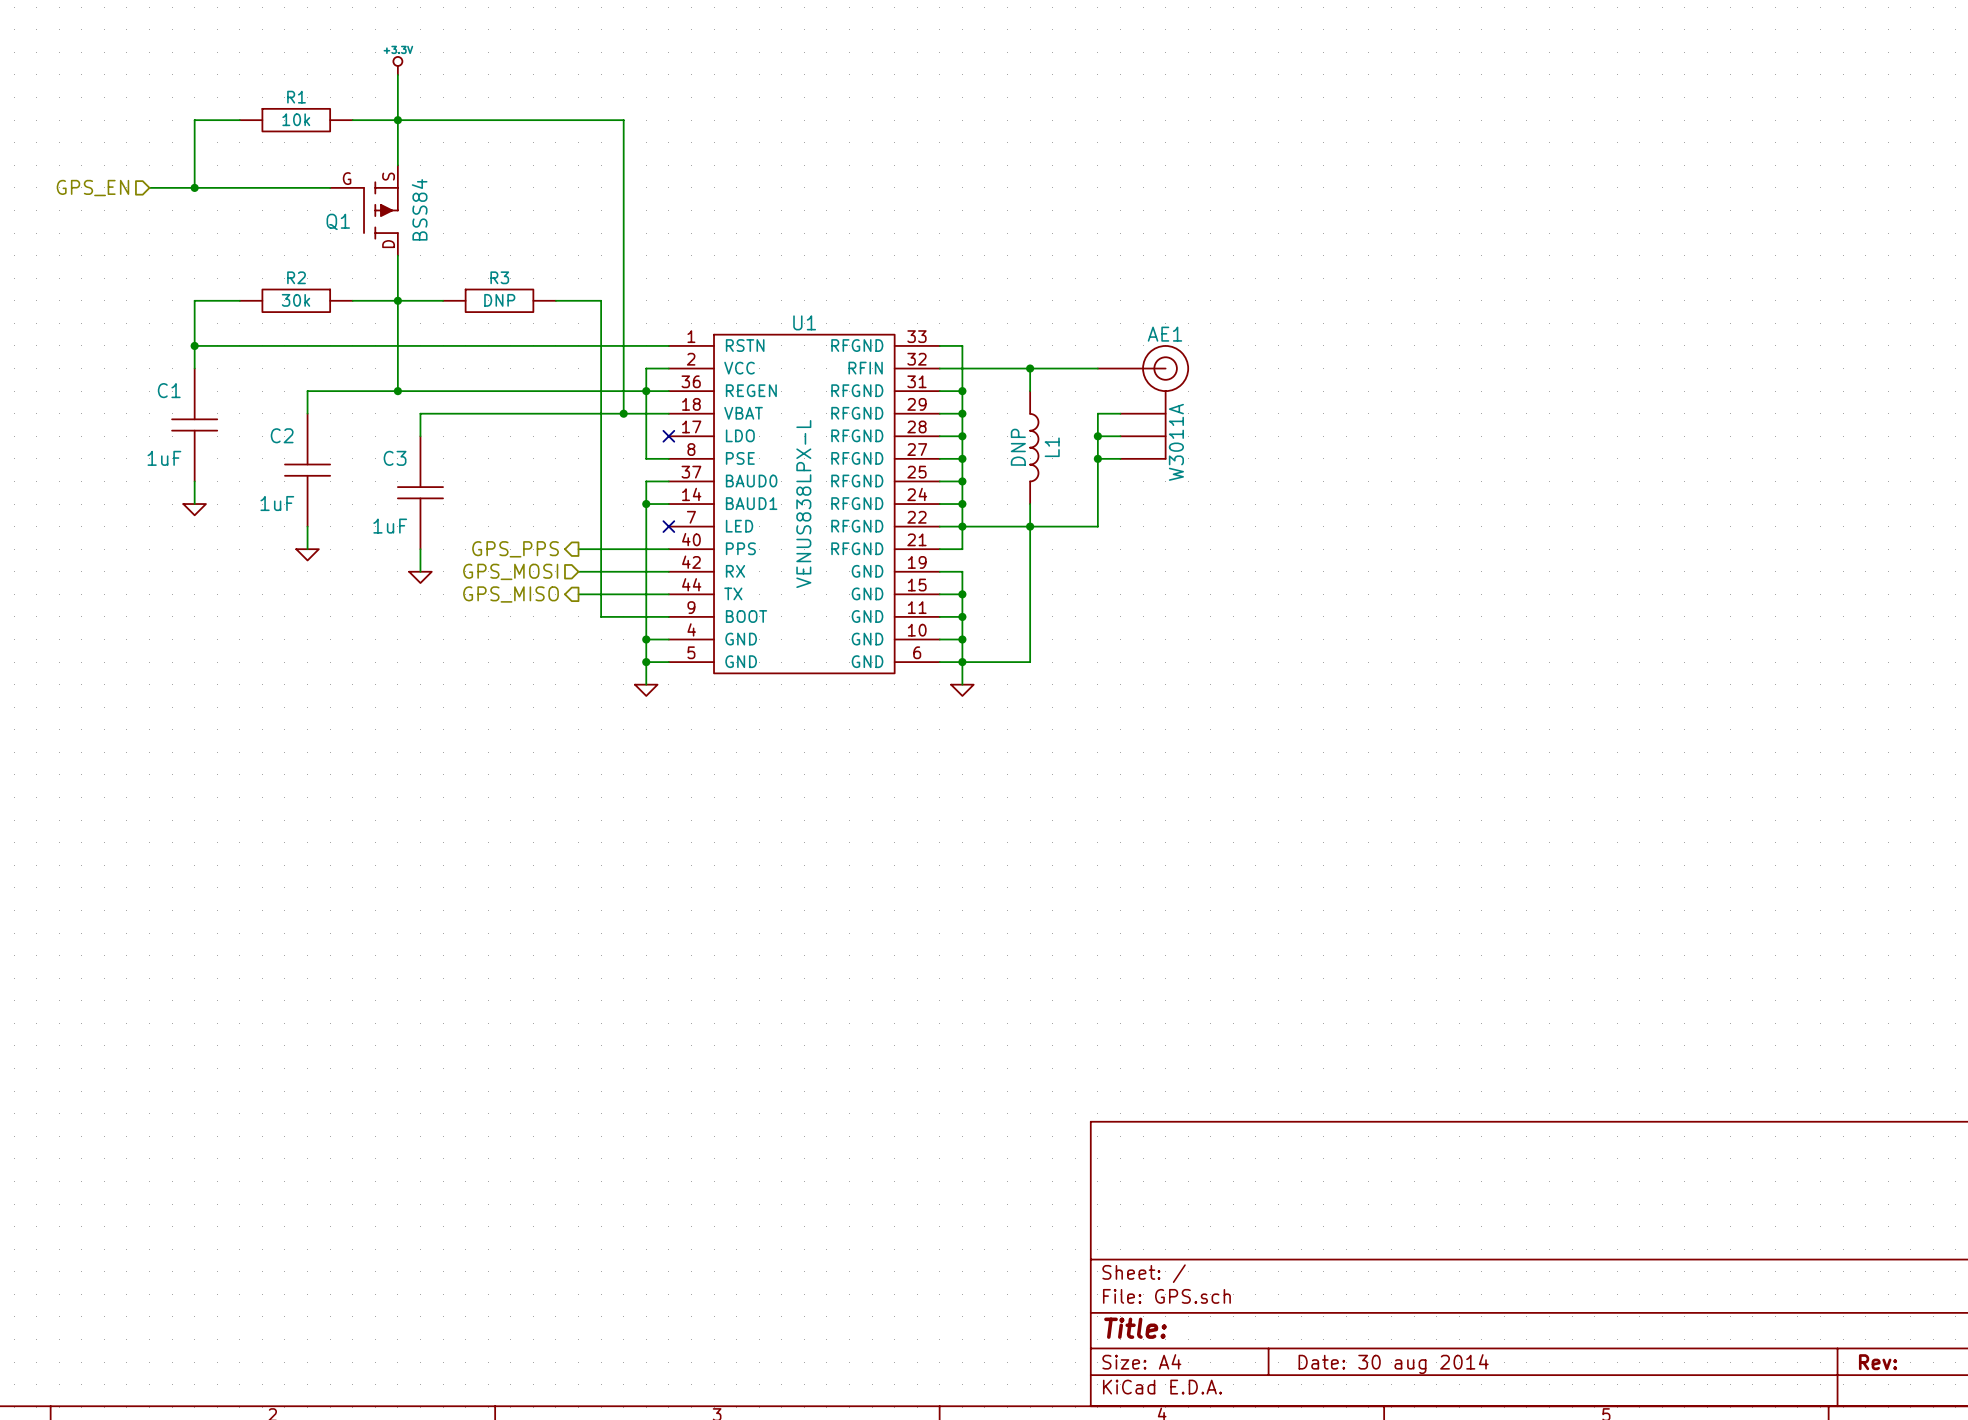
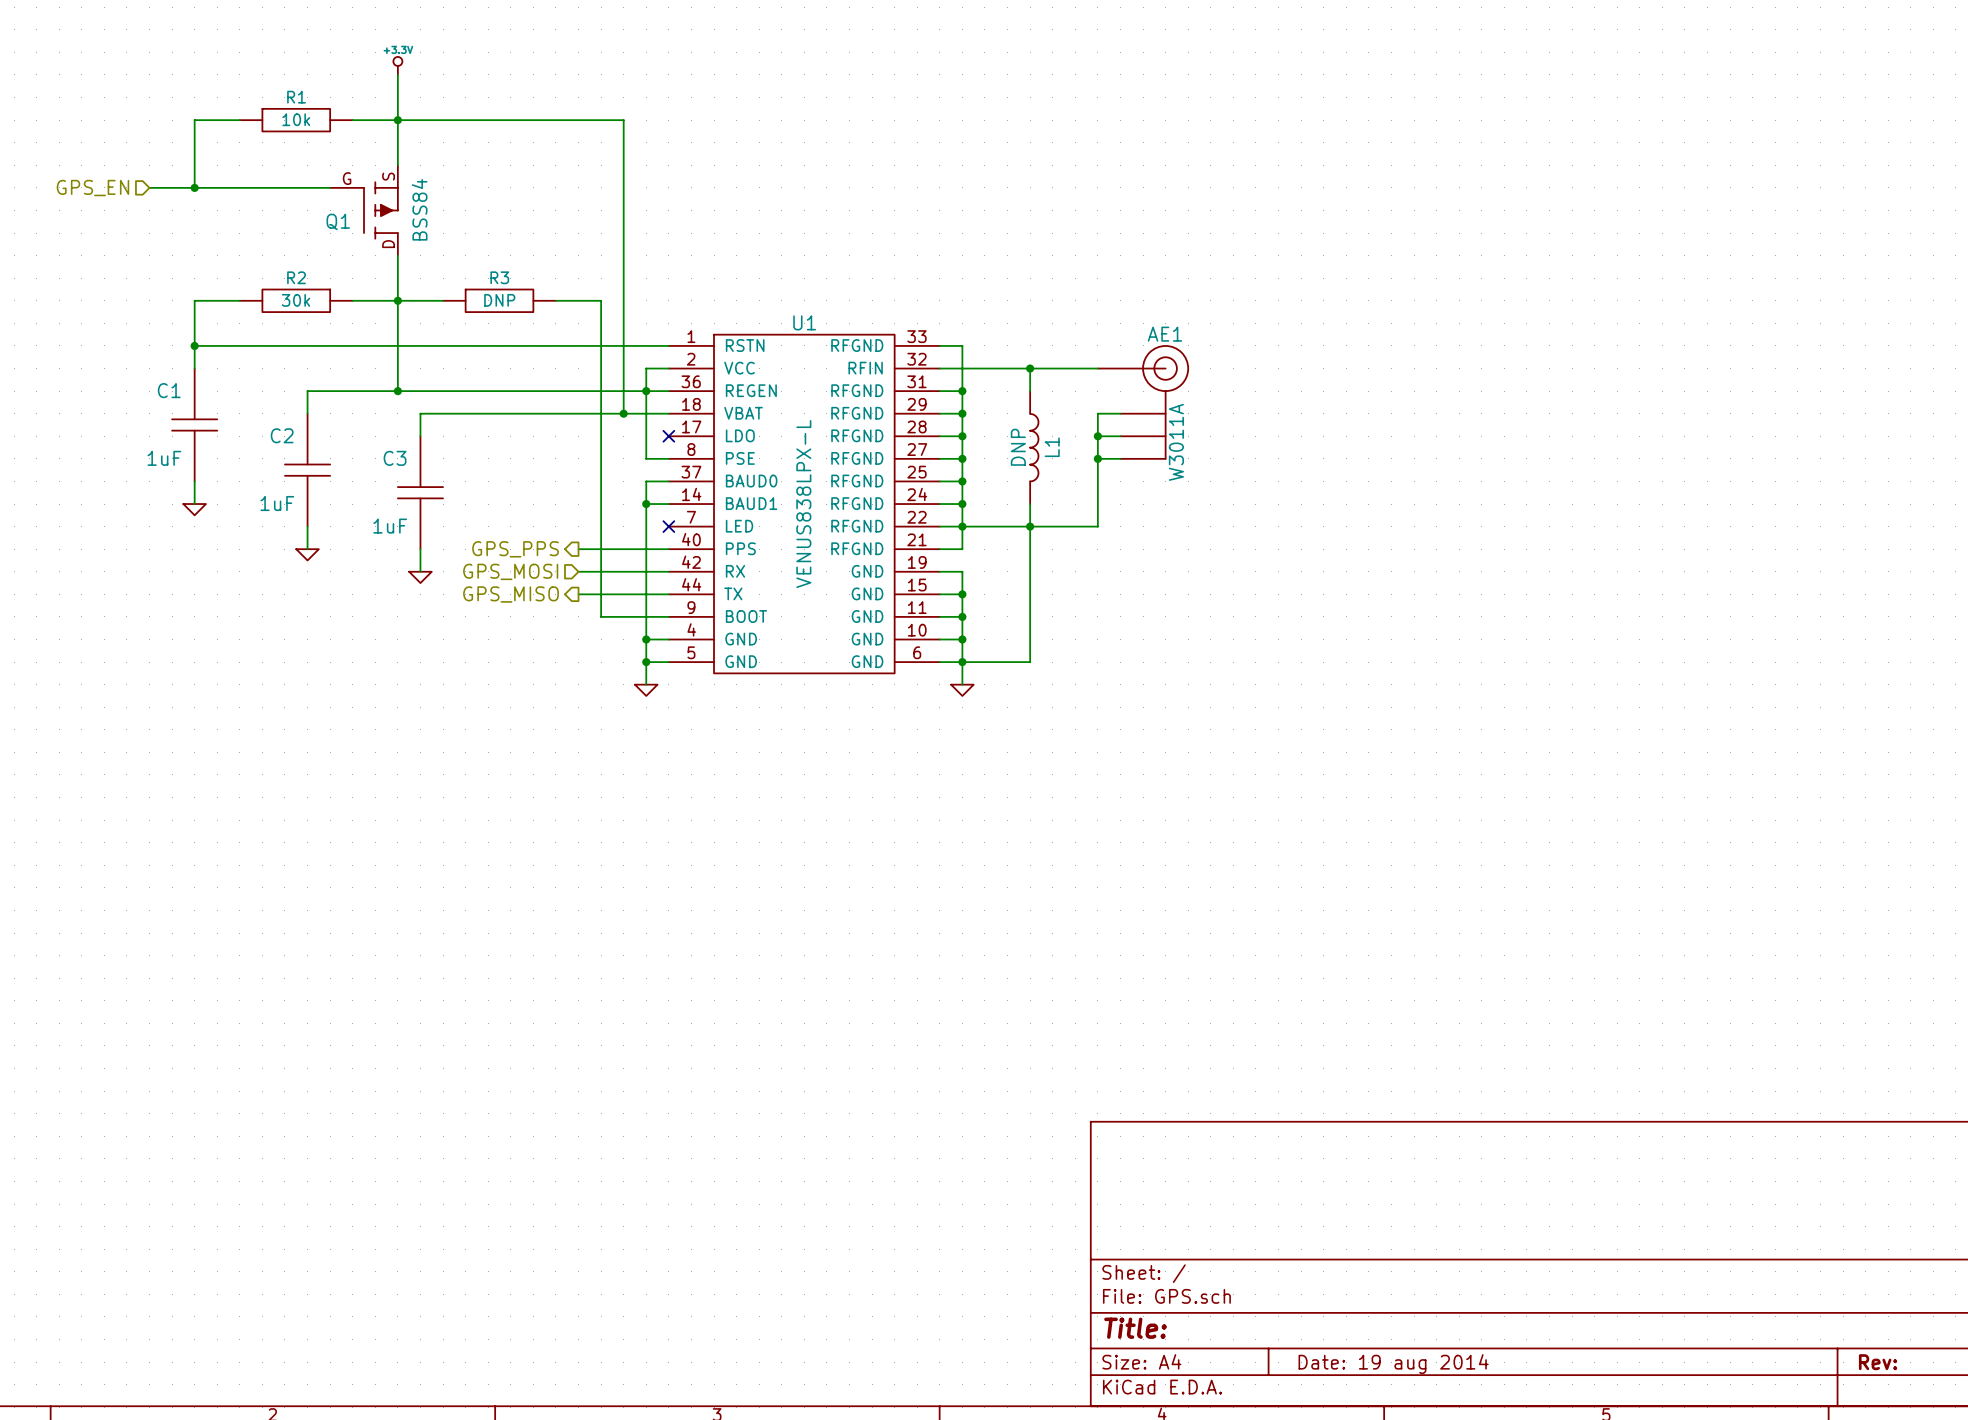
title block: Date: 30 aug 2014 (1393, 1364) -> Date: 19 aug 2014 (1393, 1364)

